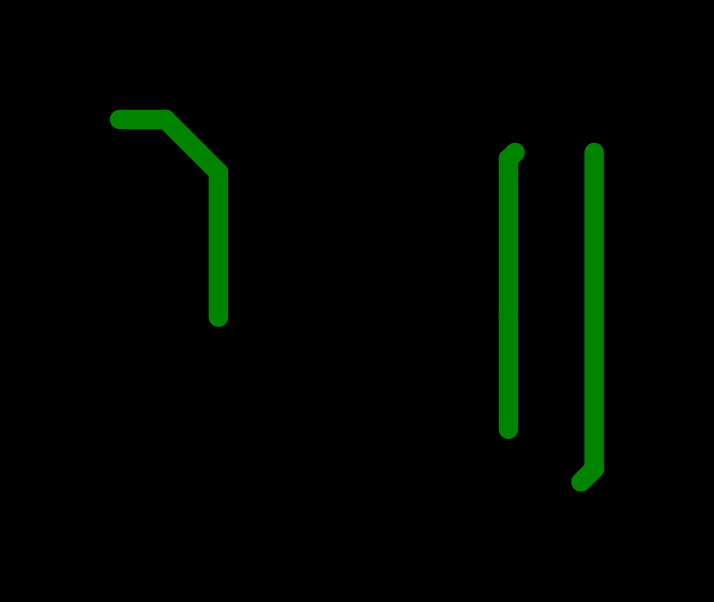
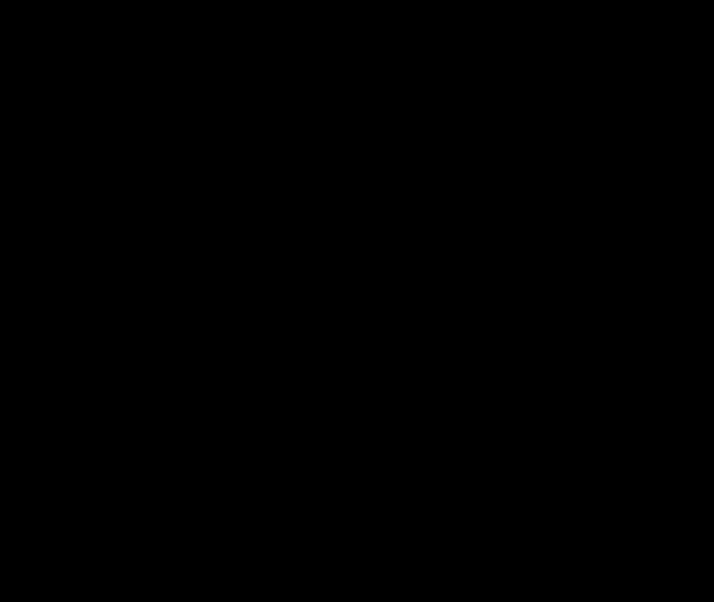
bottom track: (119, 119) (165, 119) (218, 172) (218, 317) -> none
bottom track: (515, 152) (508, 159) (508, 429) -> none
bottom track: (594, 152) (594, 468) (580, 482) -> none

